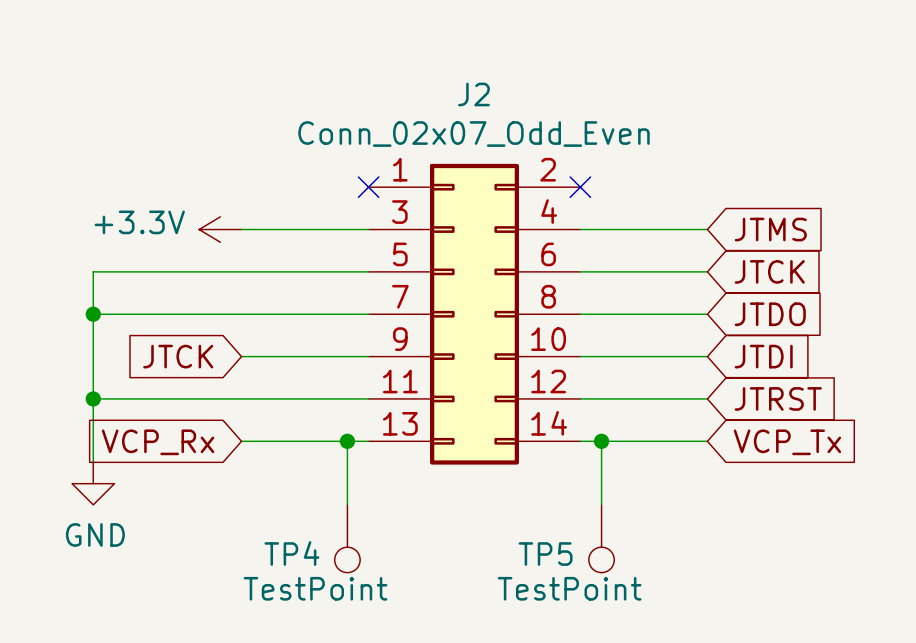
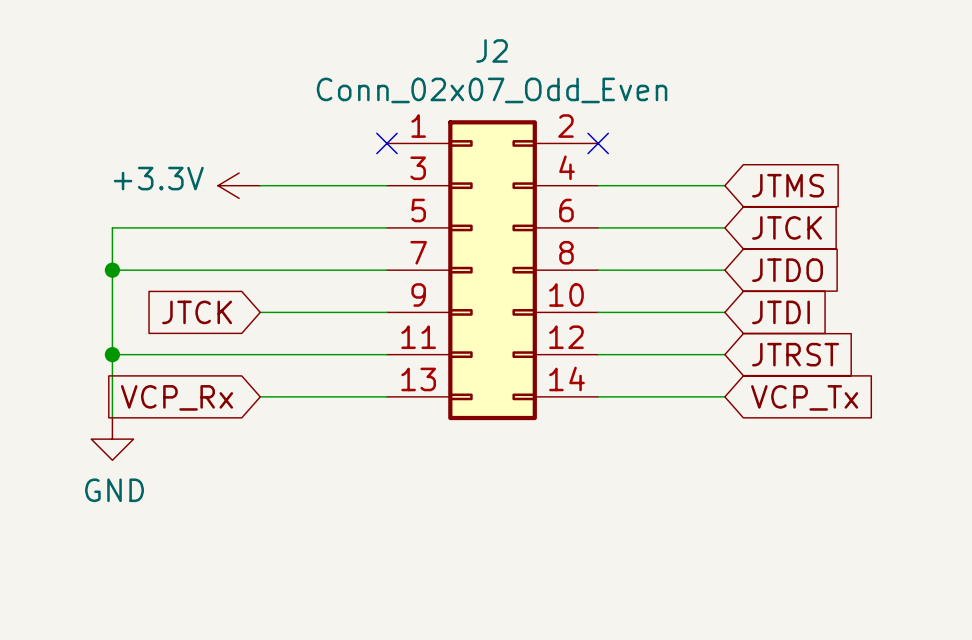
wire: (347, 441) (347, 504) -> none
junction: (347, 441) -> none
wire: (601, 441) (601, 504) -> none
junction: (601, 441) -> none
TP4: TestPoint (347, 538) -> none
TP5: TestPoint (601, 538) -> none

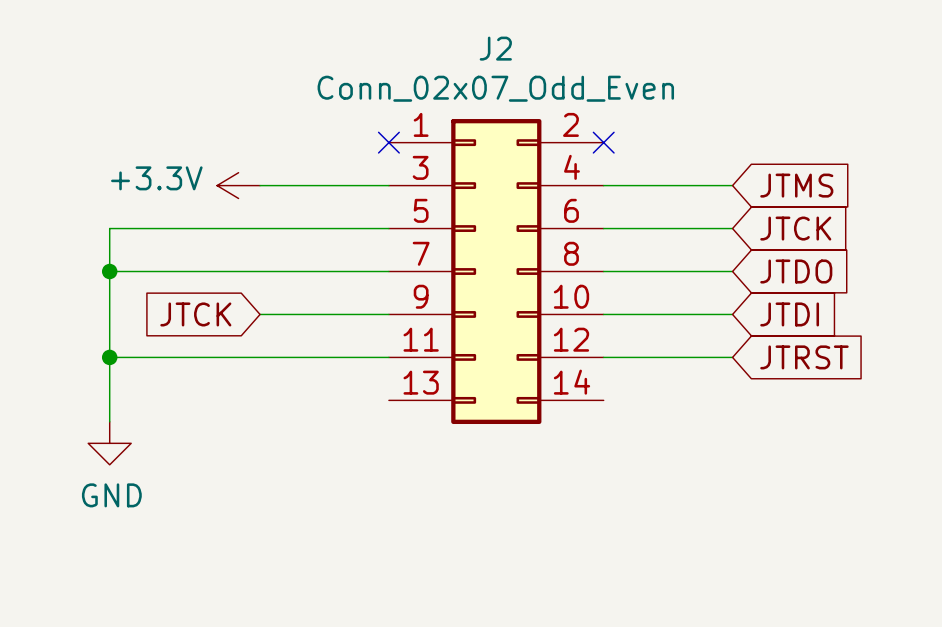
wire: (260, 396) (386, 396) -> none
wire: (598, 396) (724, 396) -> none
global label: VCP_Rx (176, 397) -> none
global label: VCP_Tx (804, 397) -> none

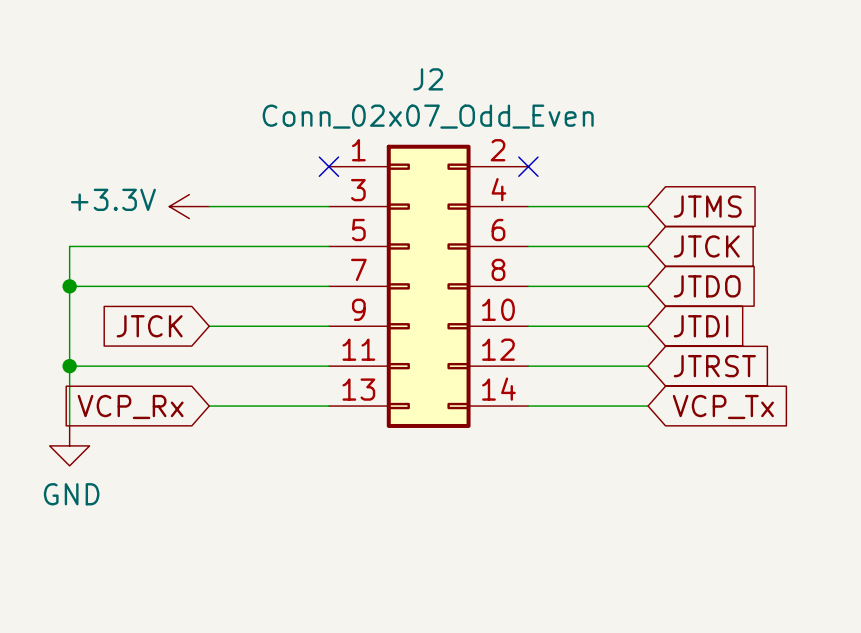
wire: none -> (209, 406) (328, 406)
wire: none -> (528, 406) (648, 406)
global label: none -> VCP_Rx (130, 406)
global label: none -> VCP_Tx (723, 406)

